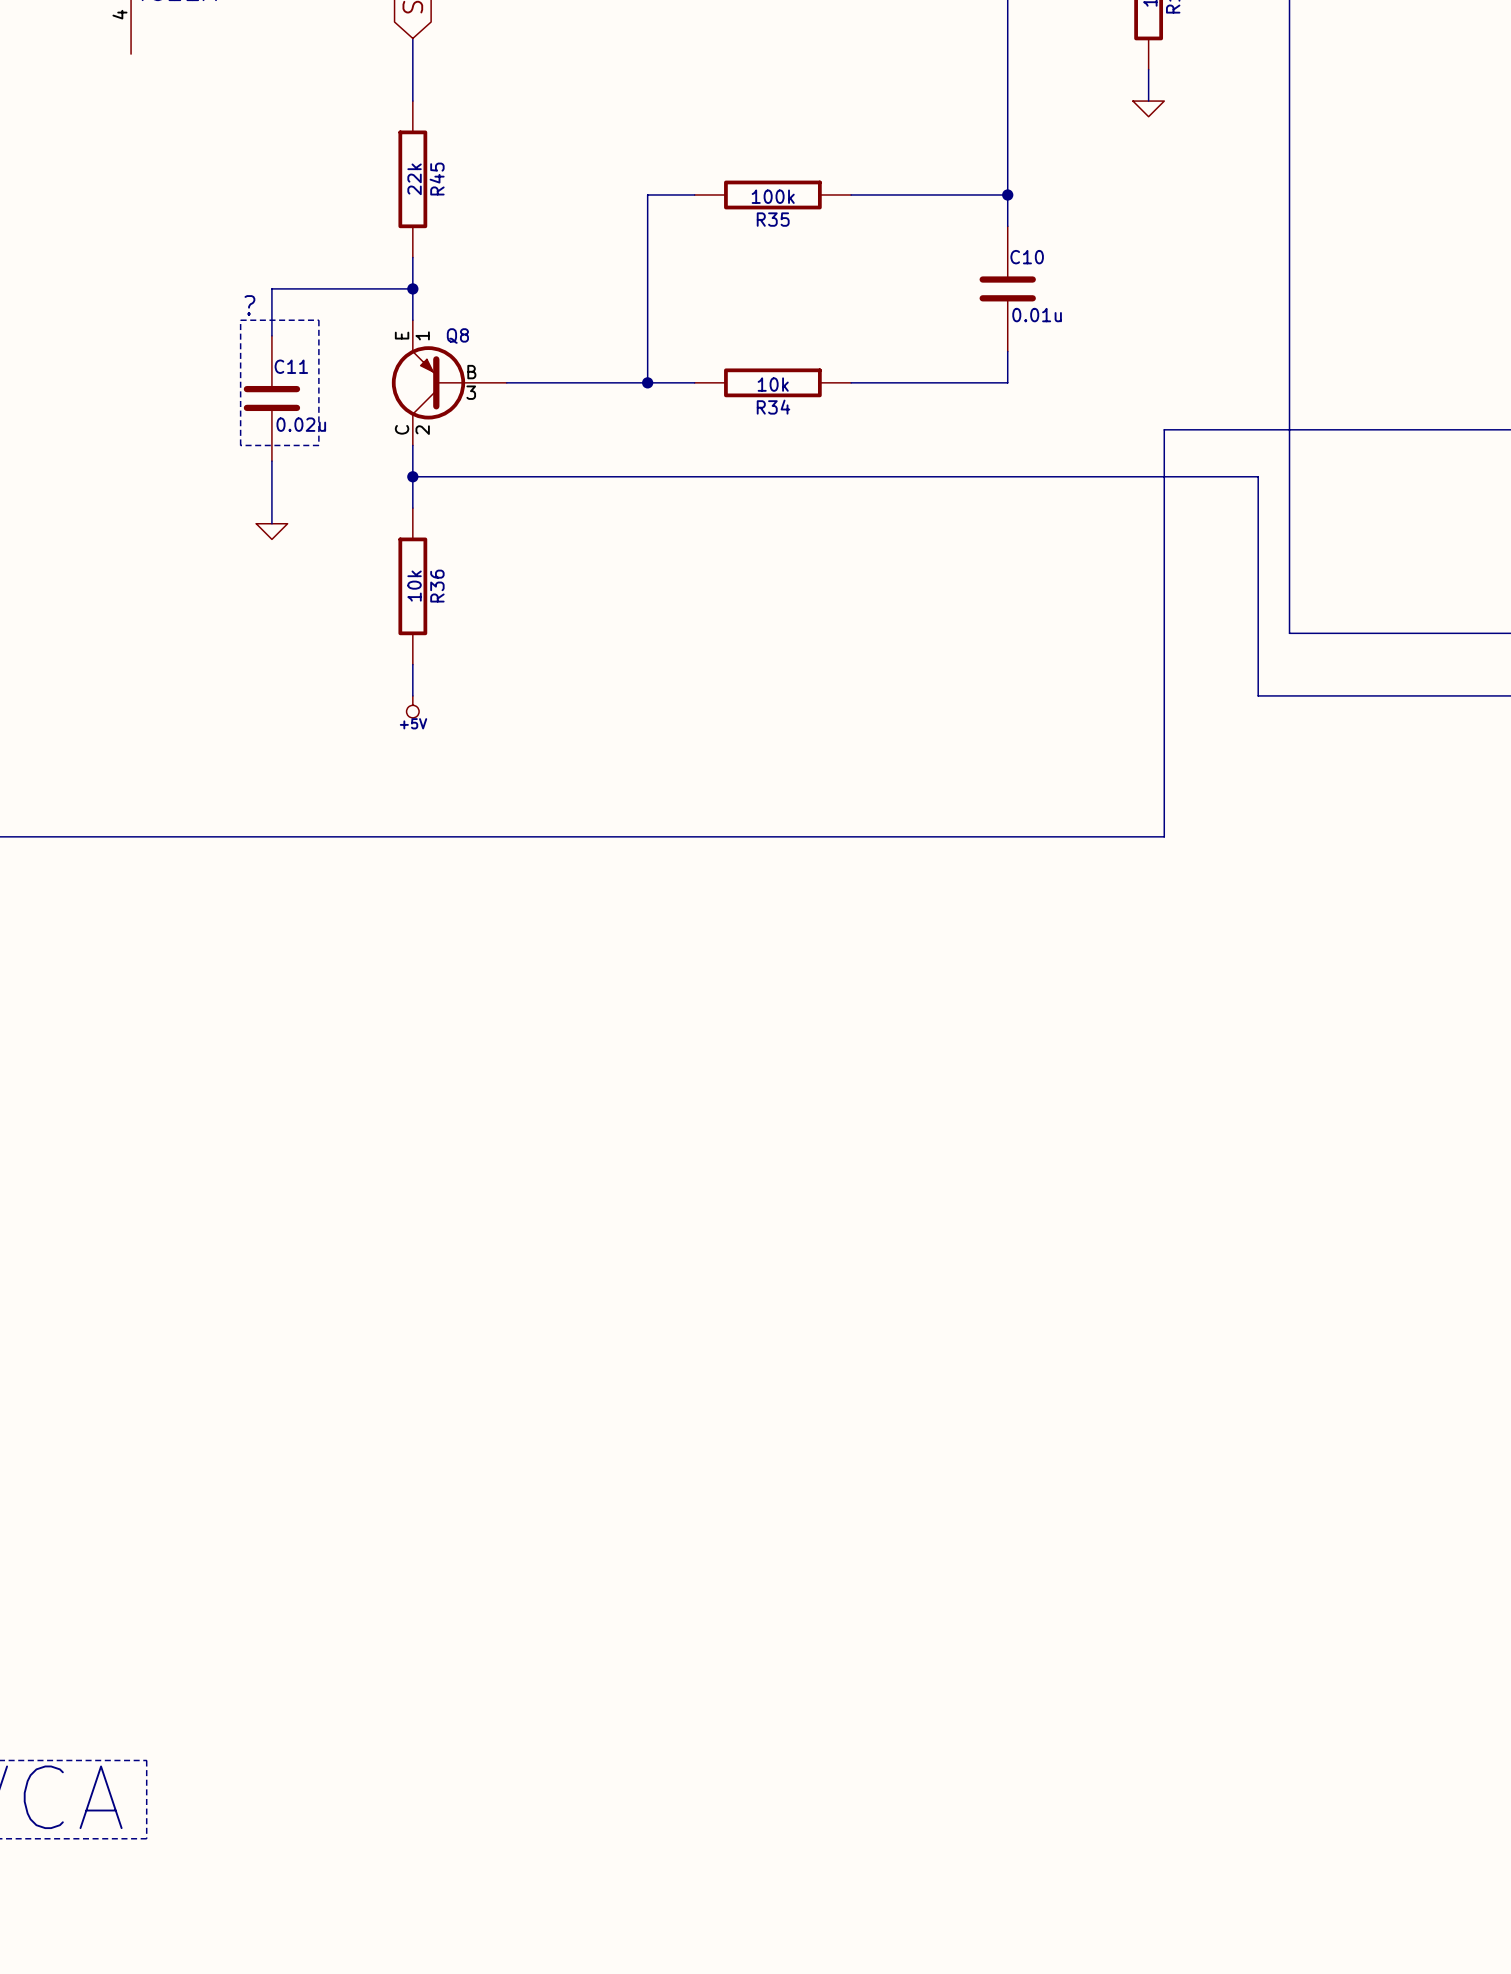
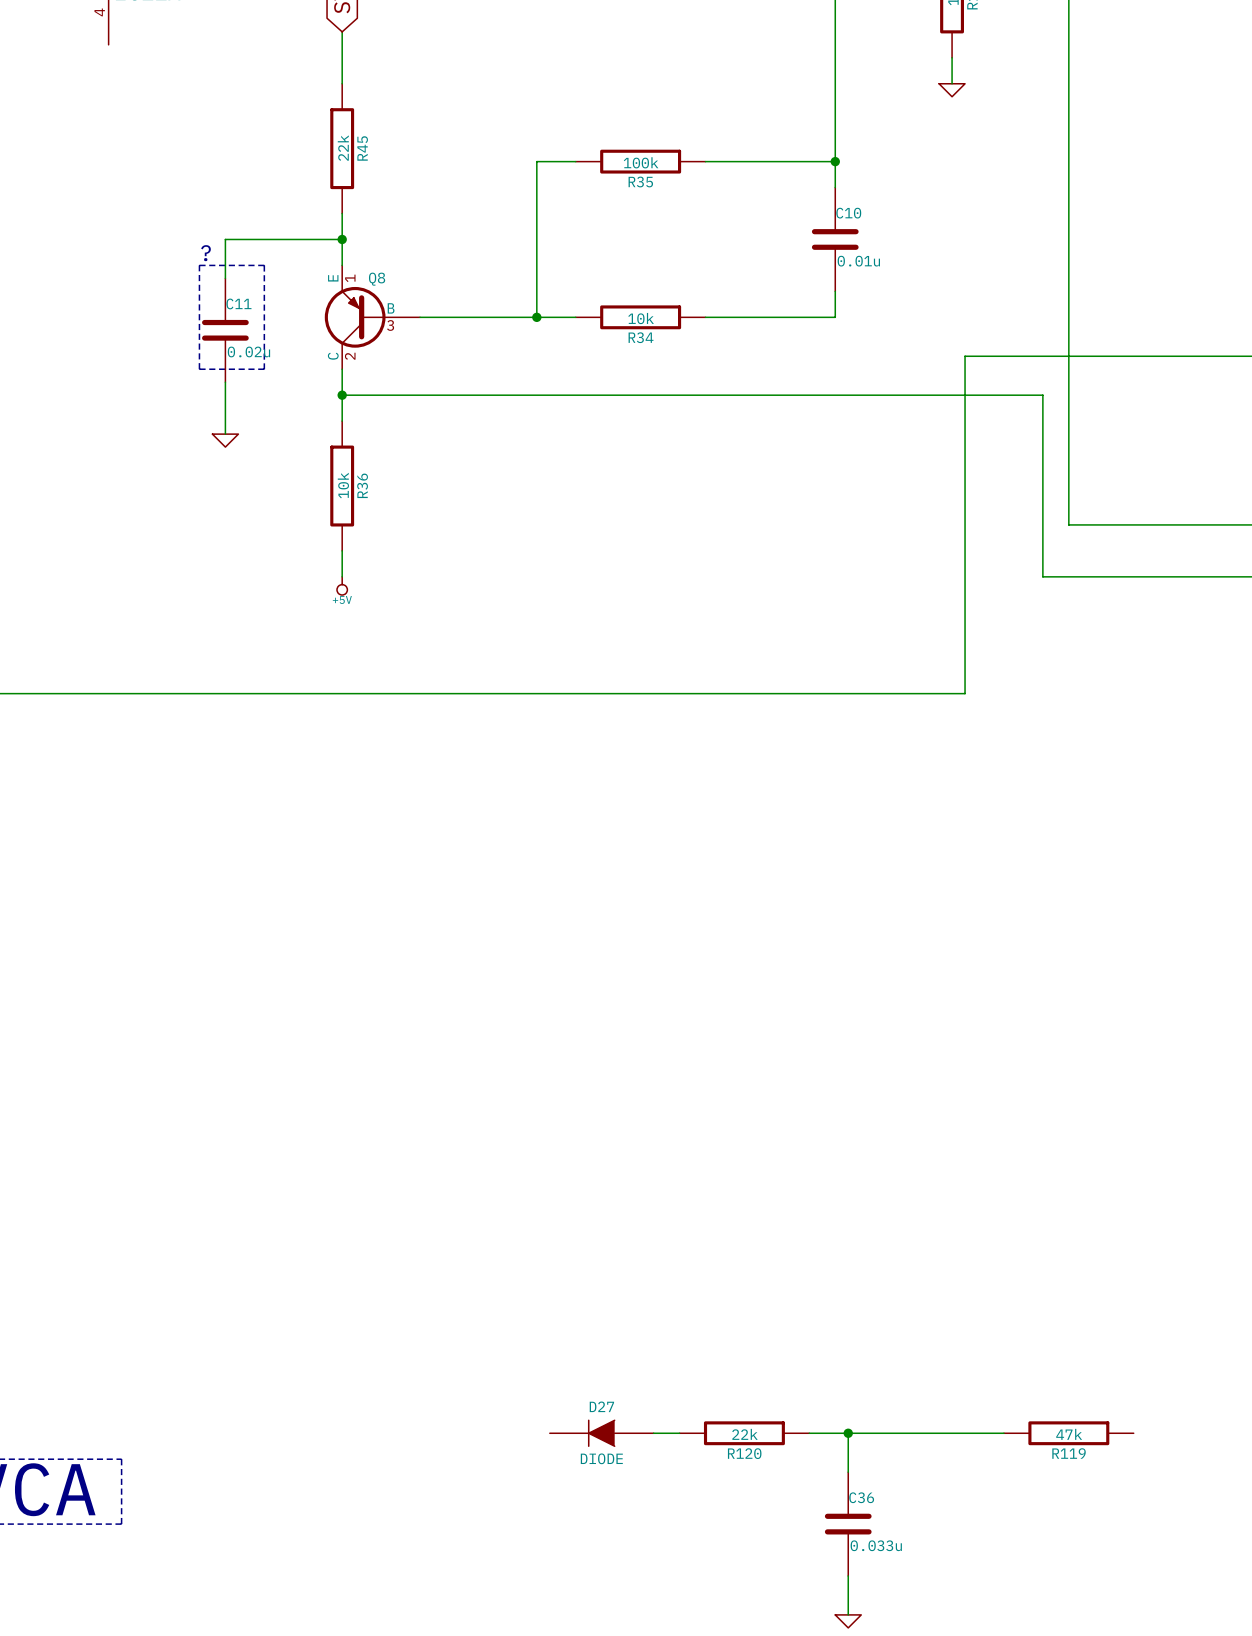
D27: none -> DIODE (601, 1433)
wire: none -> (653, 1433) (679, 1433)
R120: none -> 22k (744, 1433)
wire: none -> (809, 1433) (1003, 1433)
wire: none -> (848, 1433) (848, 1472)
junction: none -> (848, 1433)
R119: none -> 47k (1068, 1433)
C36: none -> 0.033u (848, 1524)
wire: none -> (848, 1575) (848, 1614)
power symbol: none -> (848, 1621)

